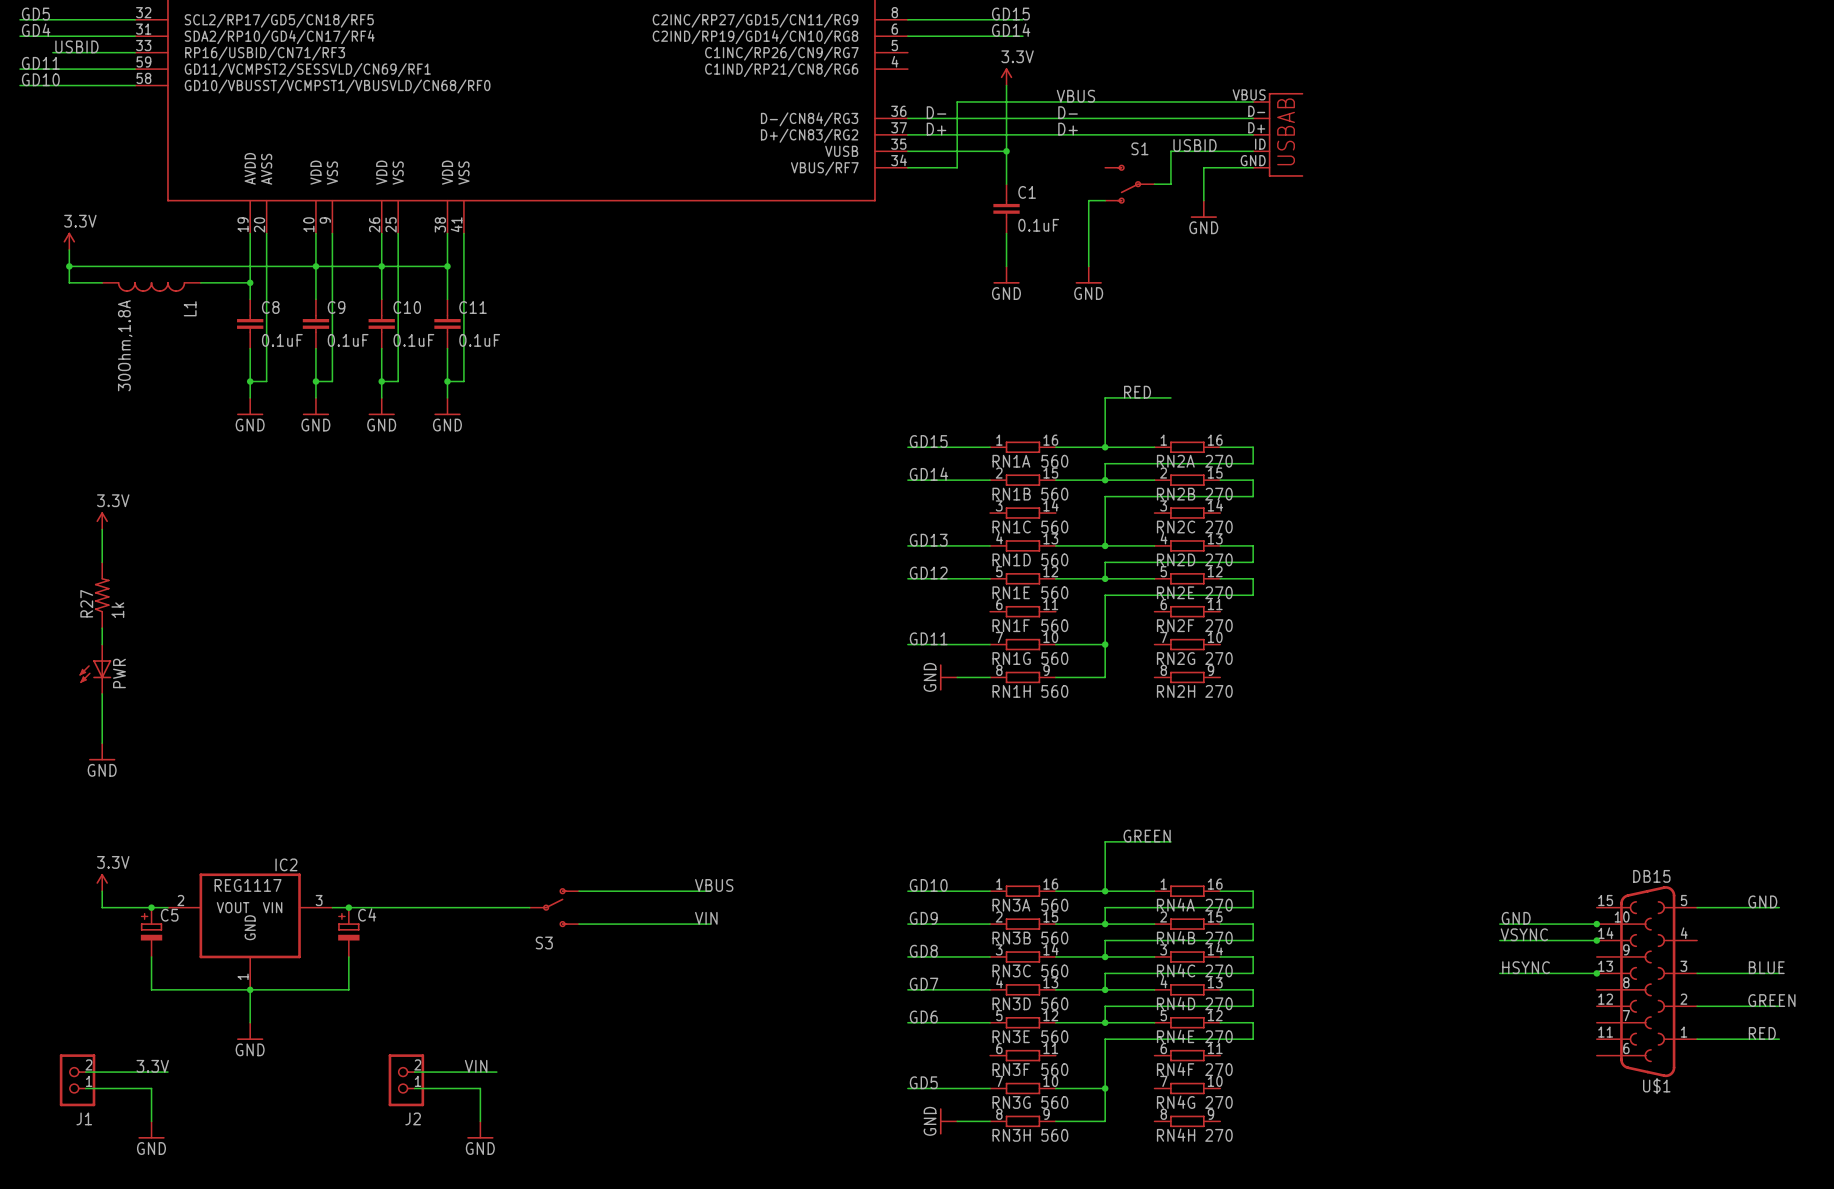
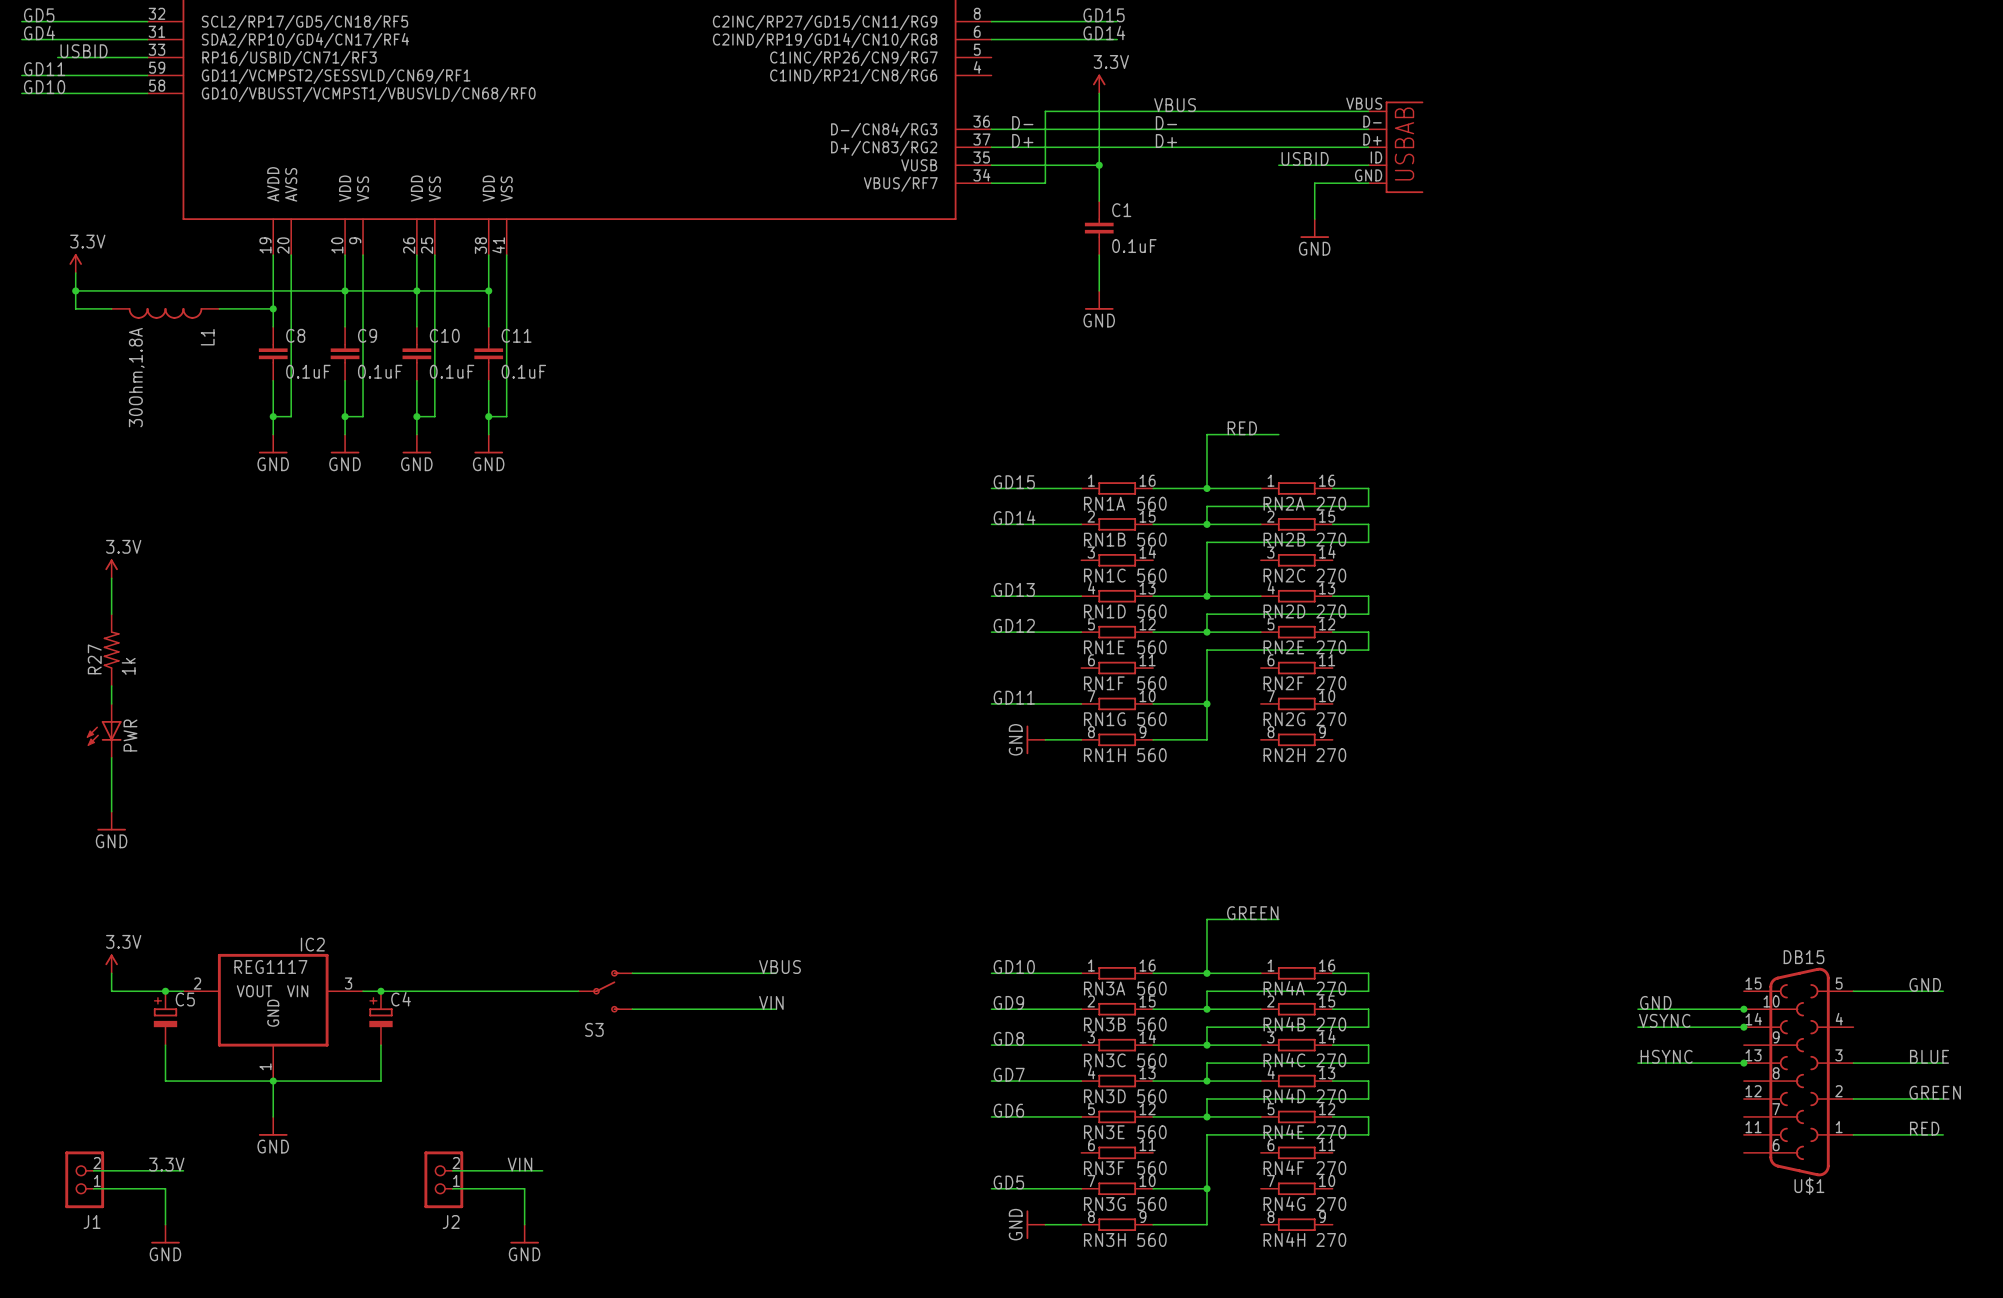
wire: (1170, 151) (1170, 184) (1154, 184) -> none
S1: (1129, 184) -> none
wire: (1105, 200) (1088, 200) (1088, 266) -> none
power symbol: GND (1088, 275) -> none

